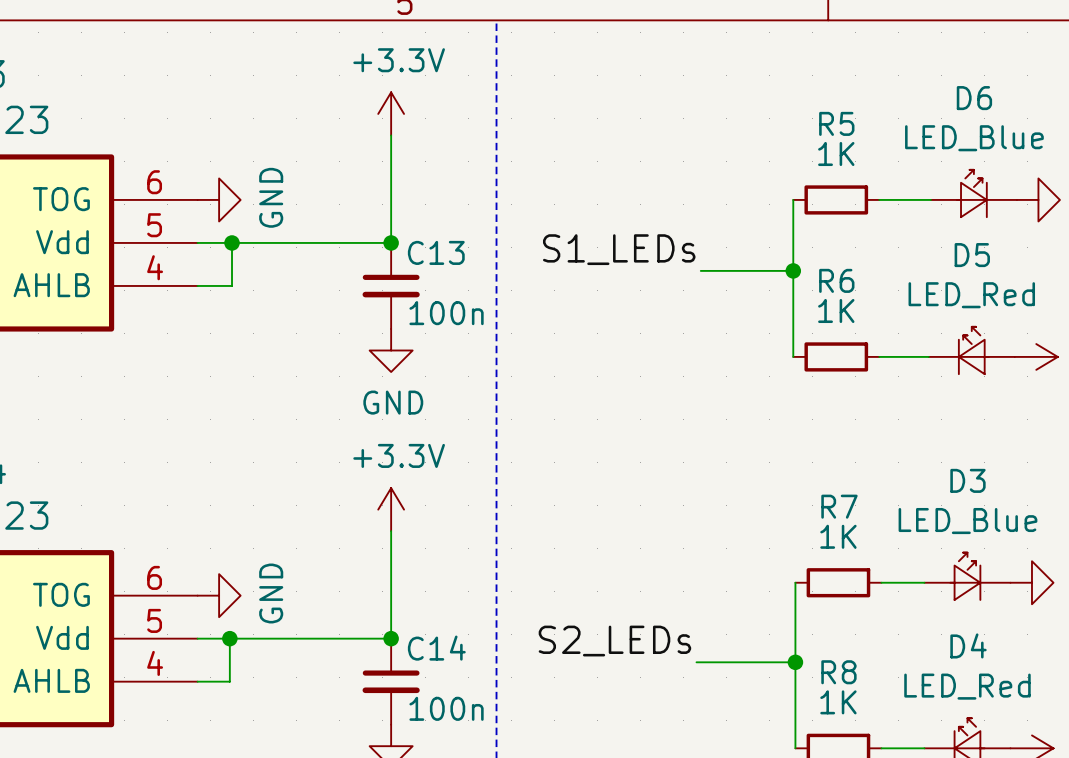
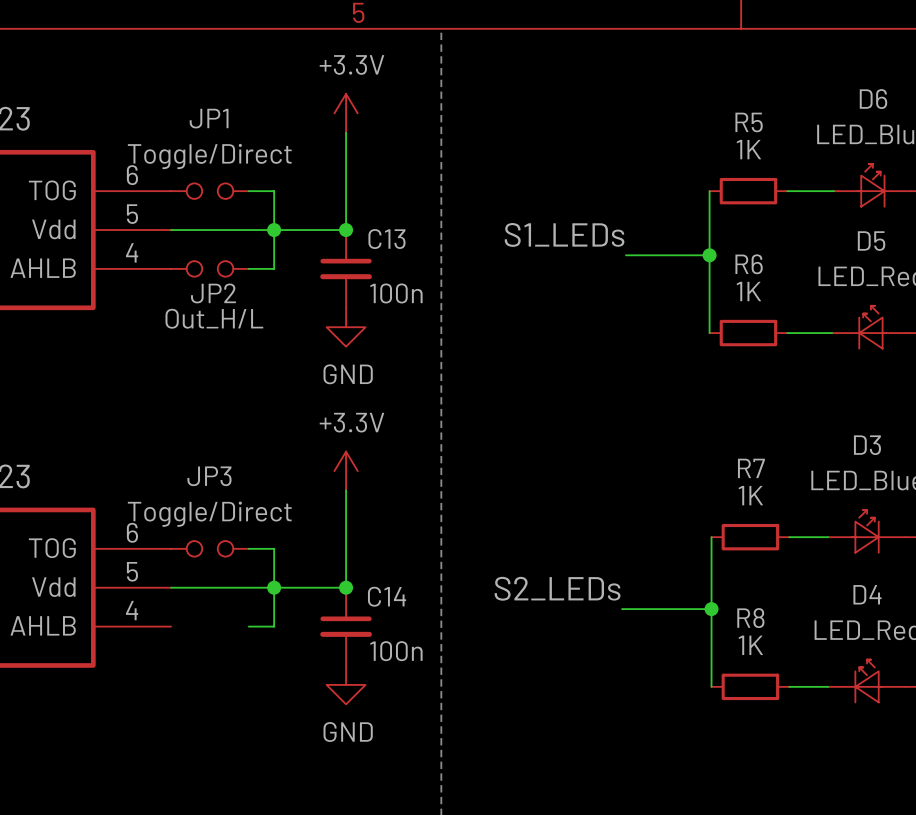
power symbol: GND (219, 199) -> none
JP1: none -> Toggle/Direct (209, 191)
wire: none -> (248, 191) (274, 191) (274, 268) (248, 268)
wire: (232, 242) (232, 285) (197, 285) -> none
junction position: (232, 242) -> (274, 230)
JP2: none -> Out_H/L (209, 268)
power symbol: GND (219, 595) -> none
JP3: none -> Toggle/Direct (209, 548)
wire: none -> (248, 548) (274, 548) (274, 626) (248, 626)
wire: (229, 638) (229, 681) (197, 681) -> none
junction position: (229, 638) -> (274, 587)

